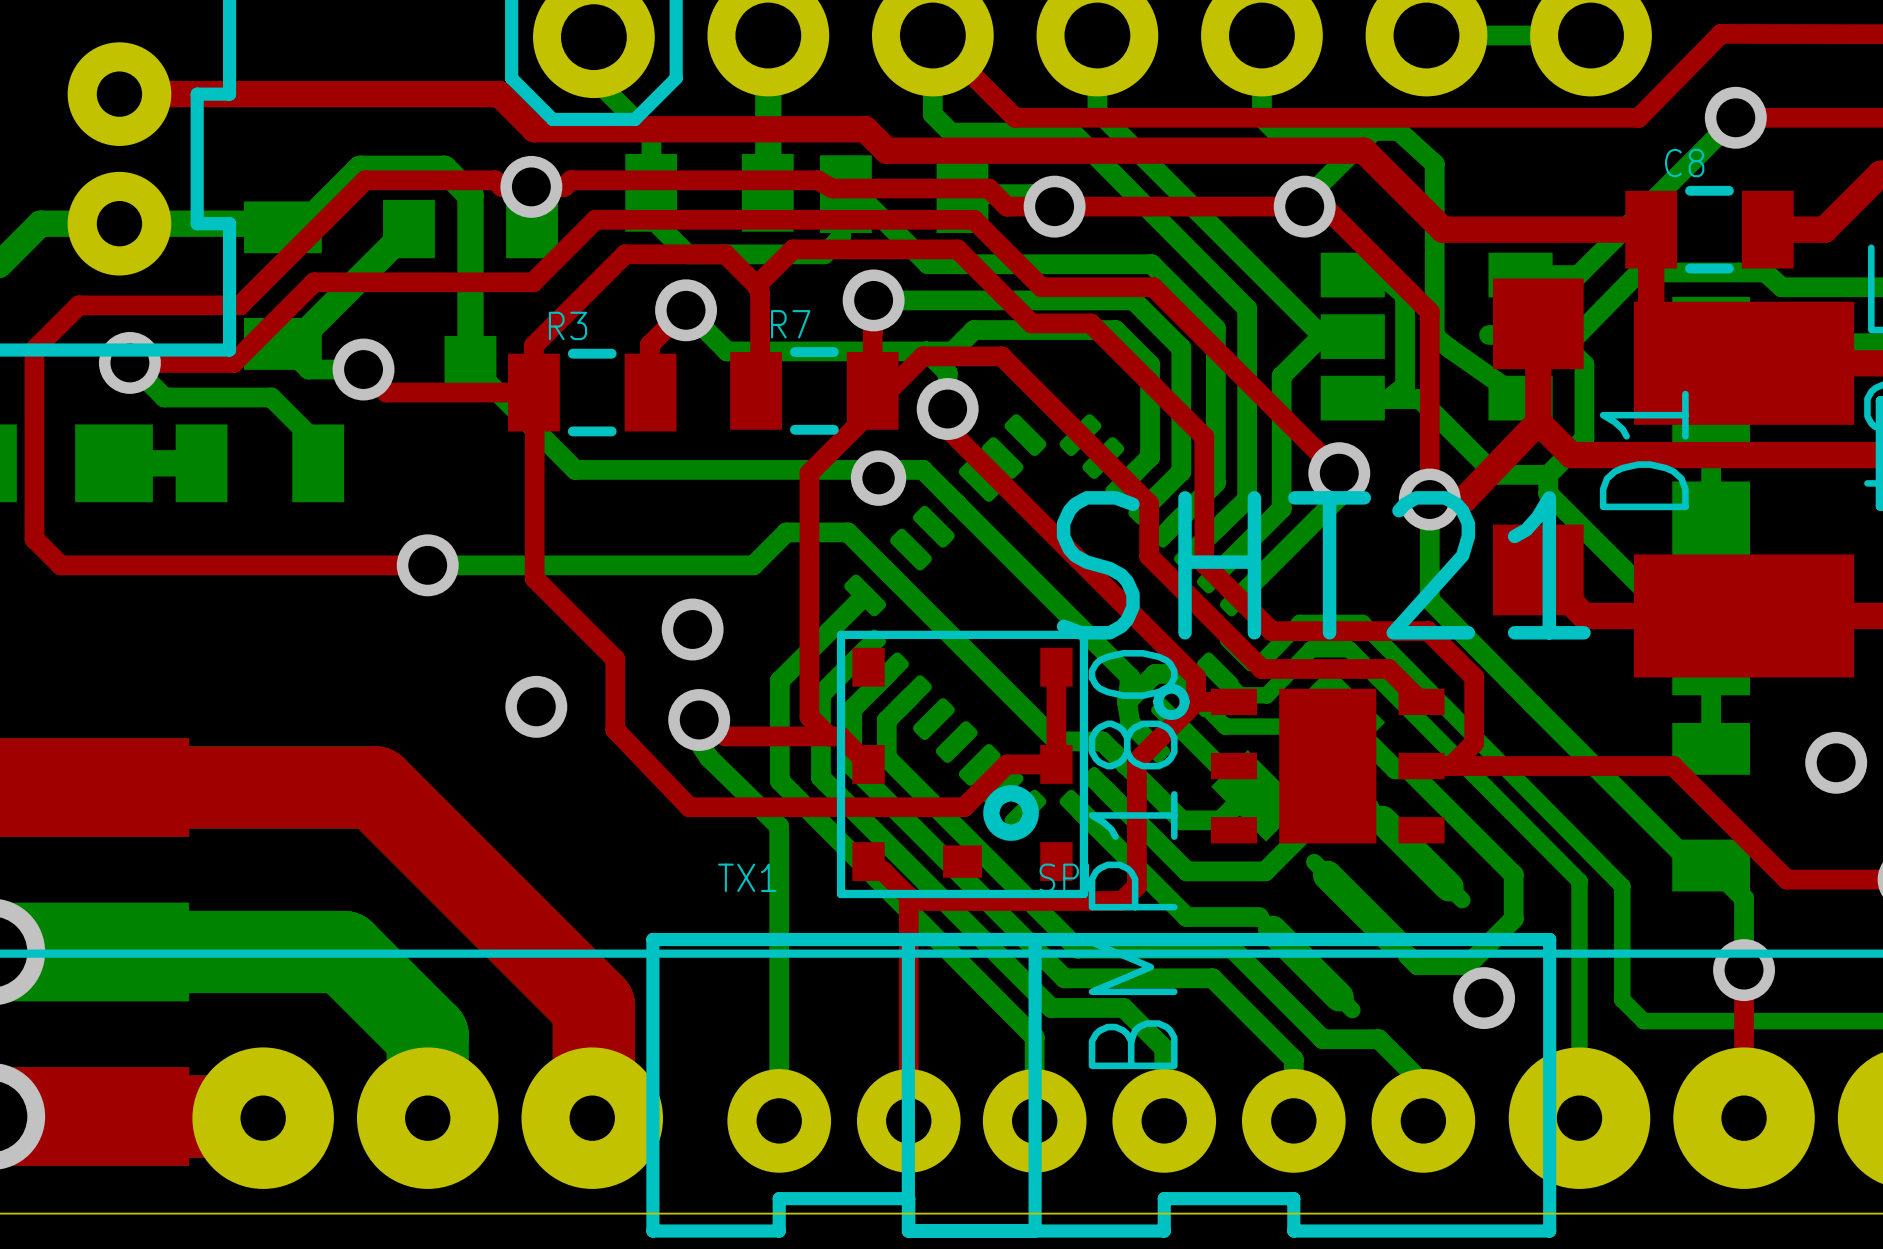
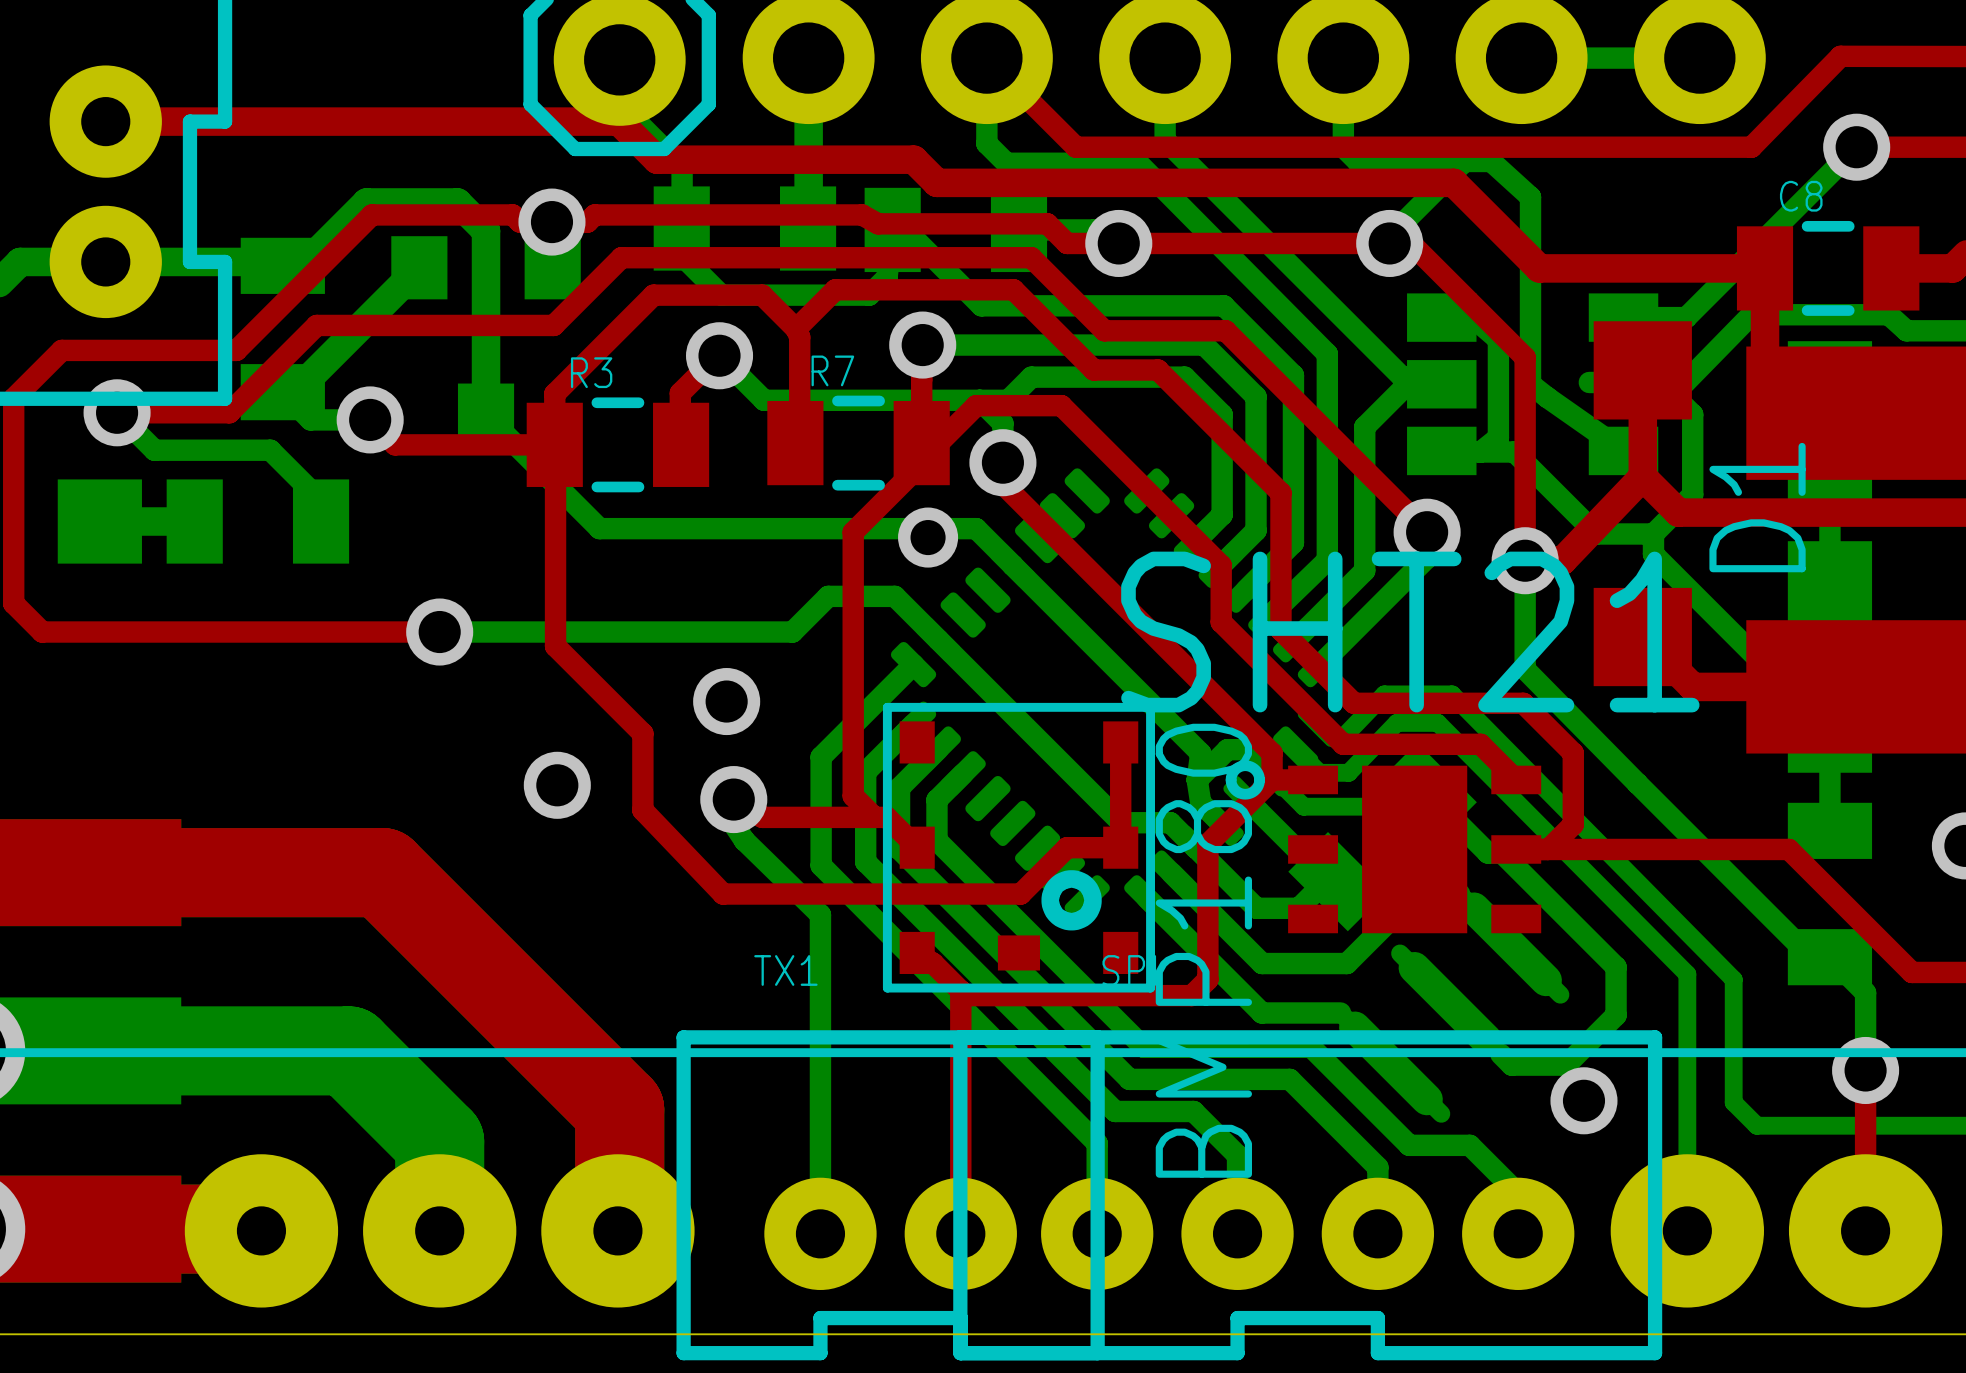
top track: (499, 94) (534, 129) (628, 129) -> (517, 121) (619, 121) (657, 159)

